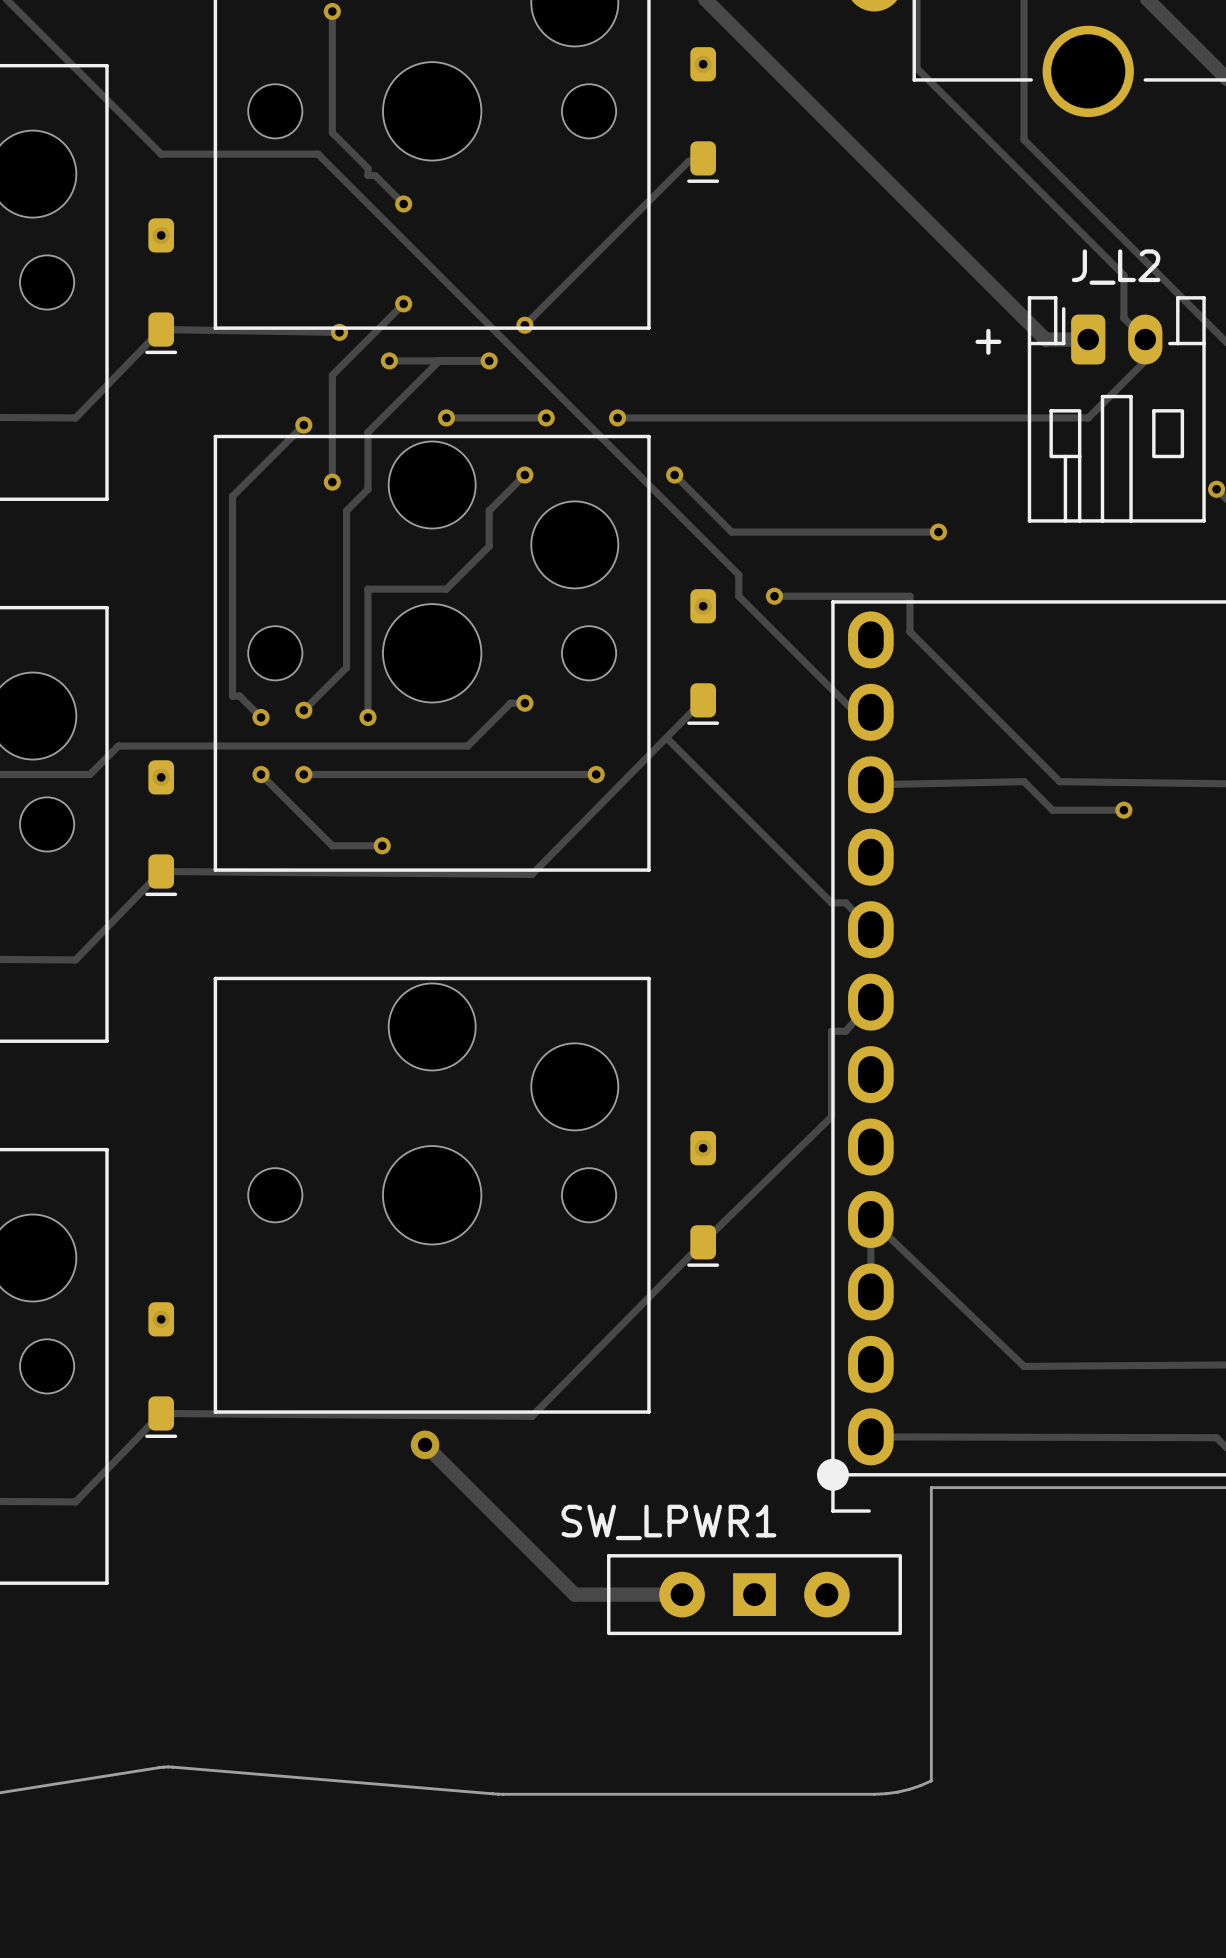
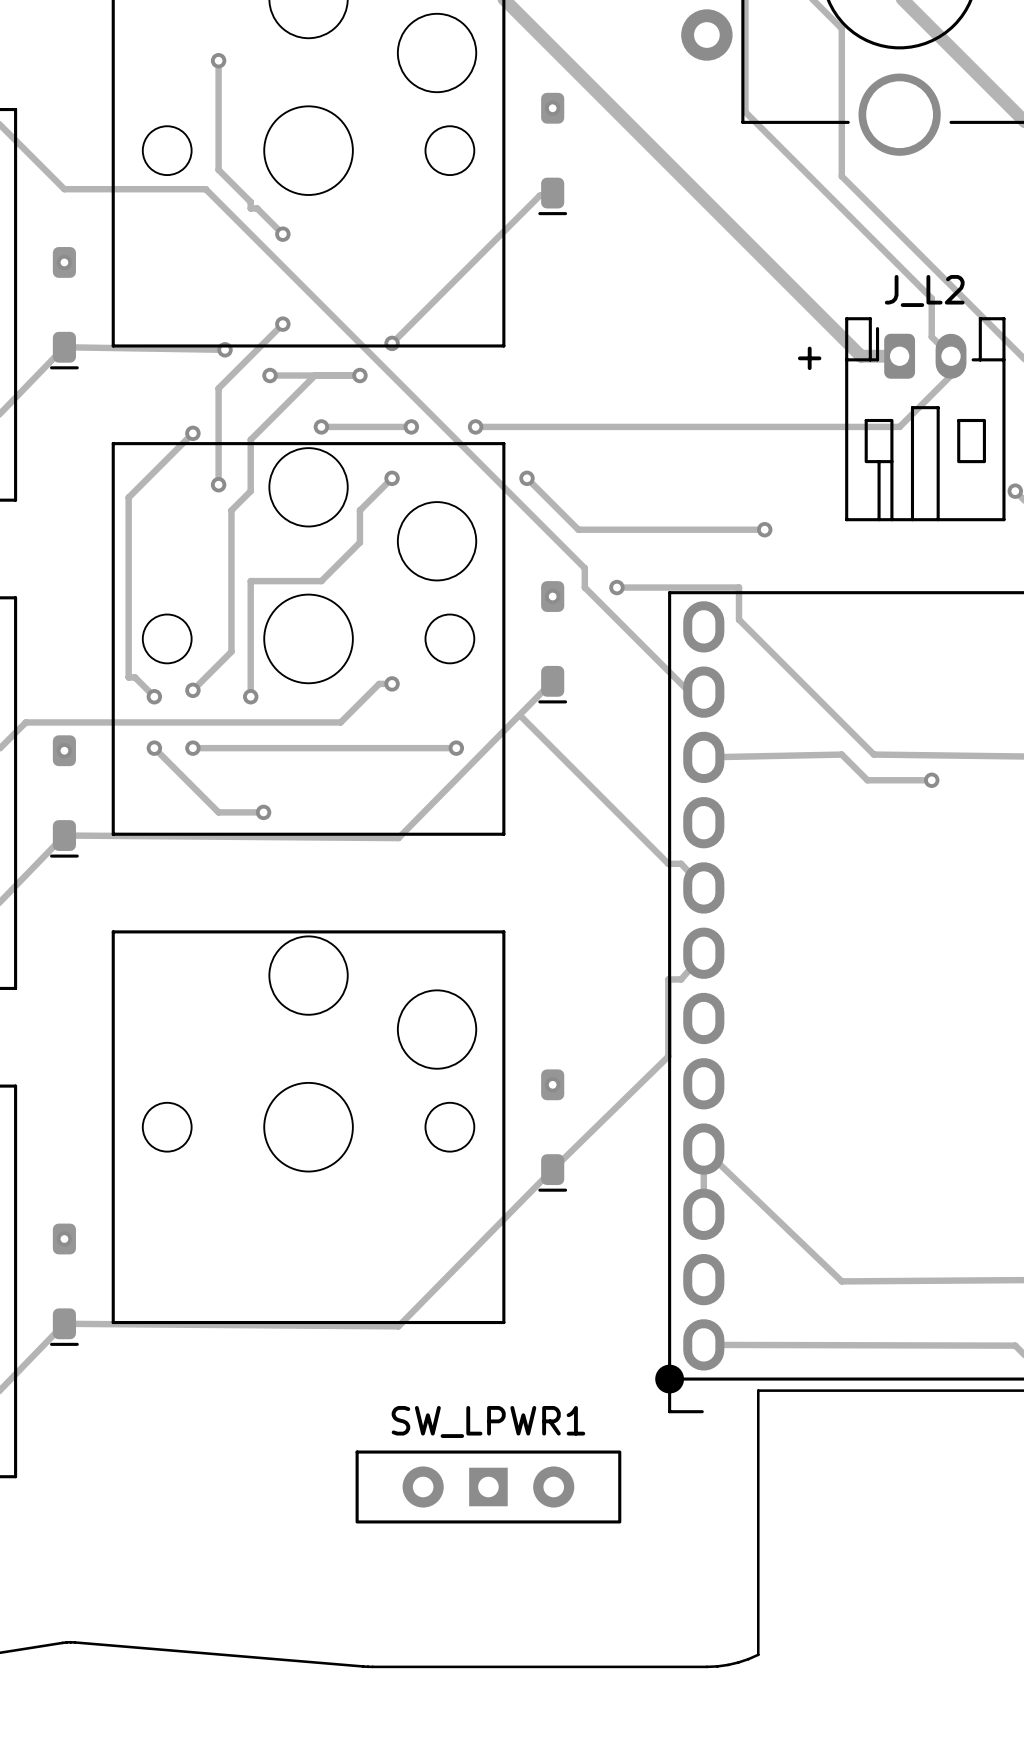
track: (425, 1444) (574, 1594) (682, 1594) -> none
via: (425, 1444) -> none
SW_LPWR1 name position: SW_LPWR1 (668, 1522) -> SW_LPWR1 (488, 1421)
SW_LPWR1 position: (754, 1594) -> (488, 1486)

